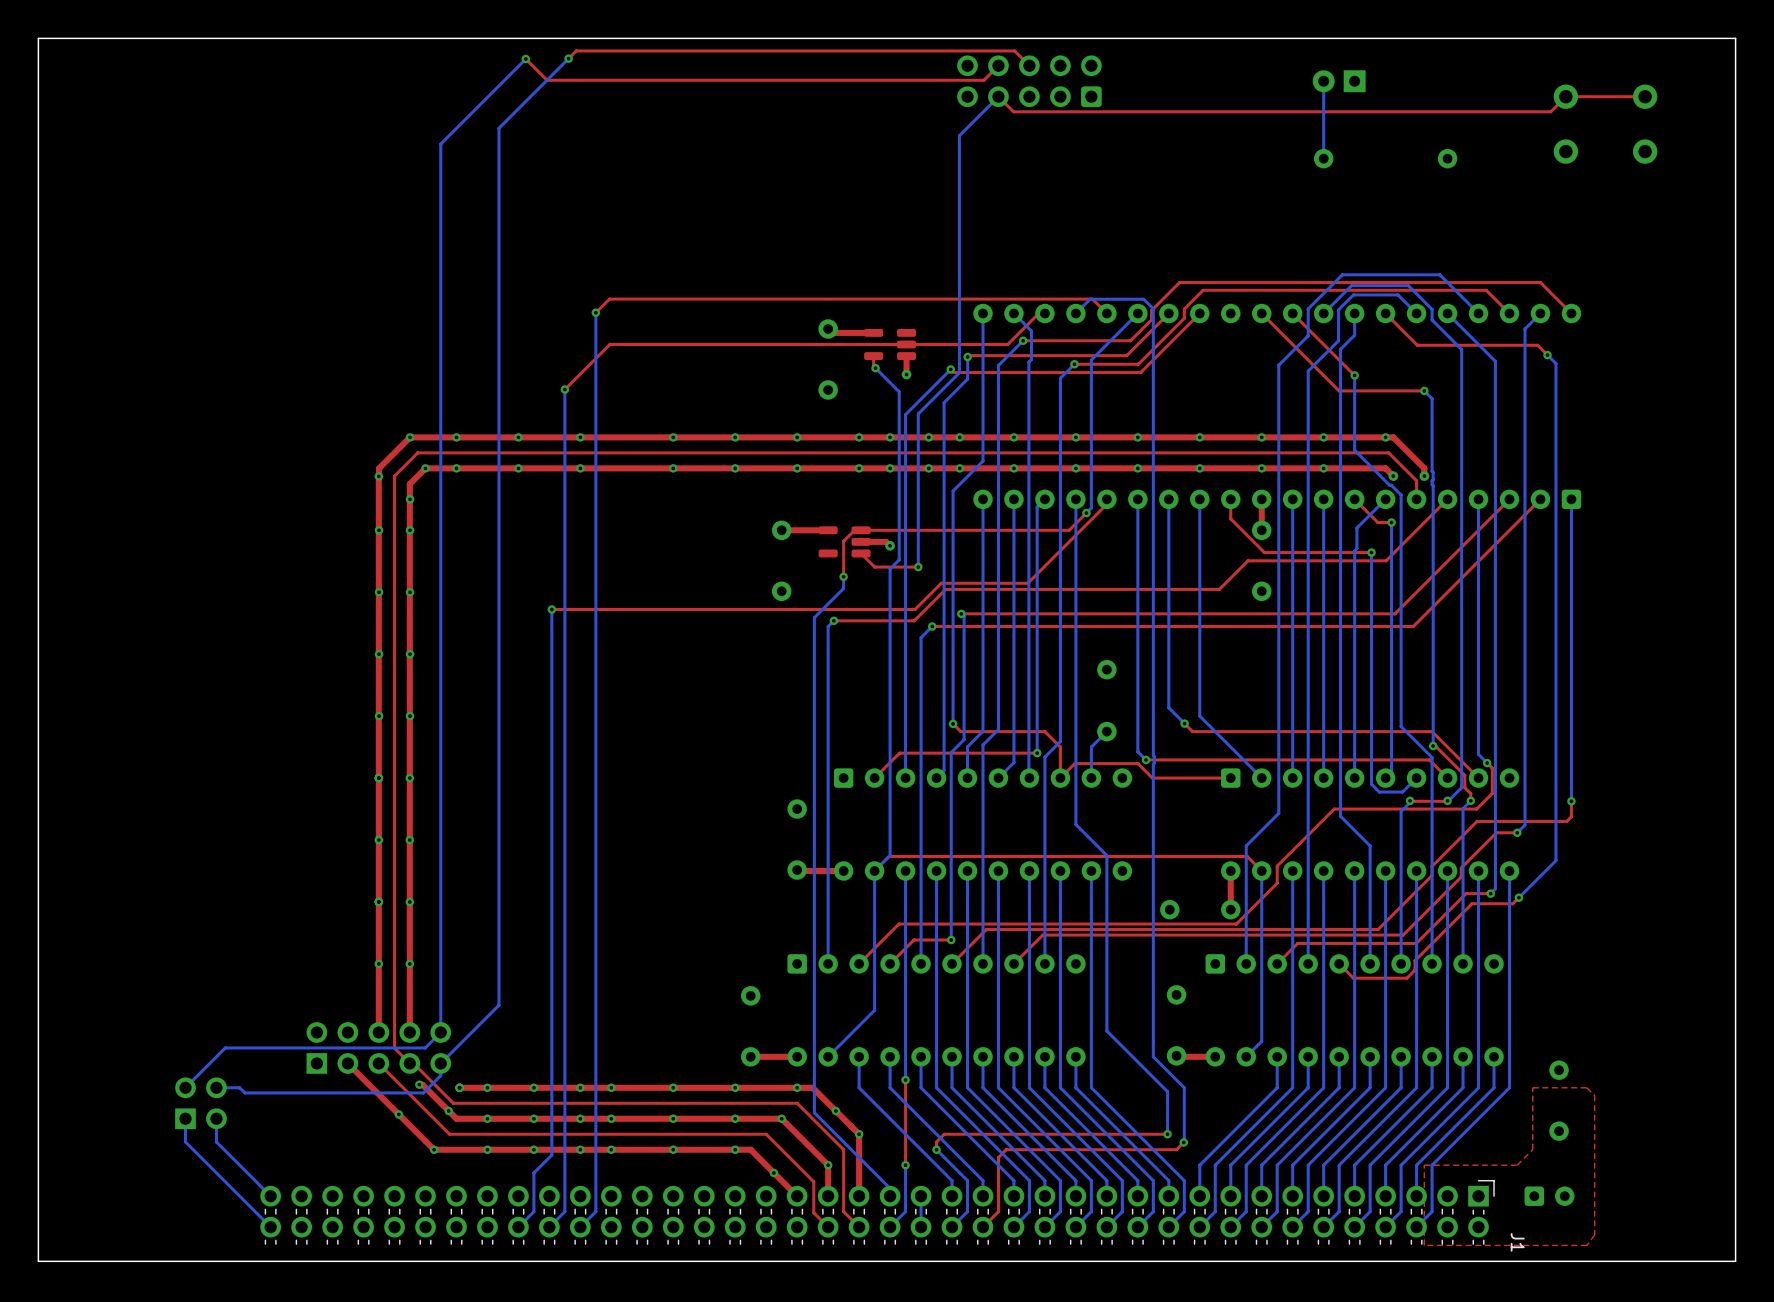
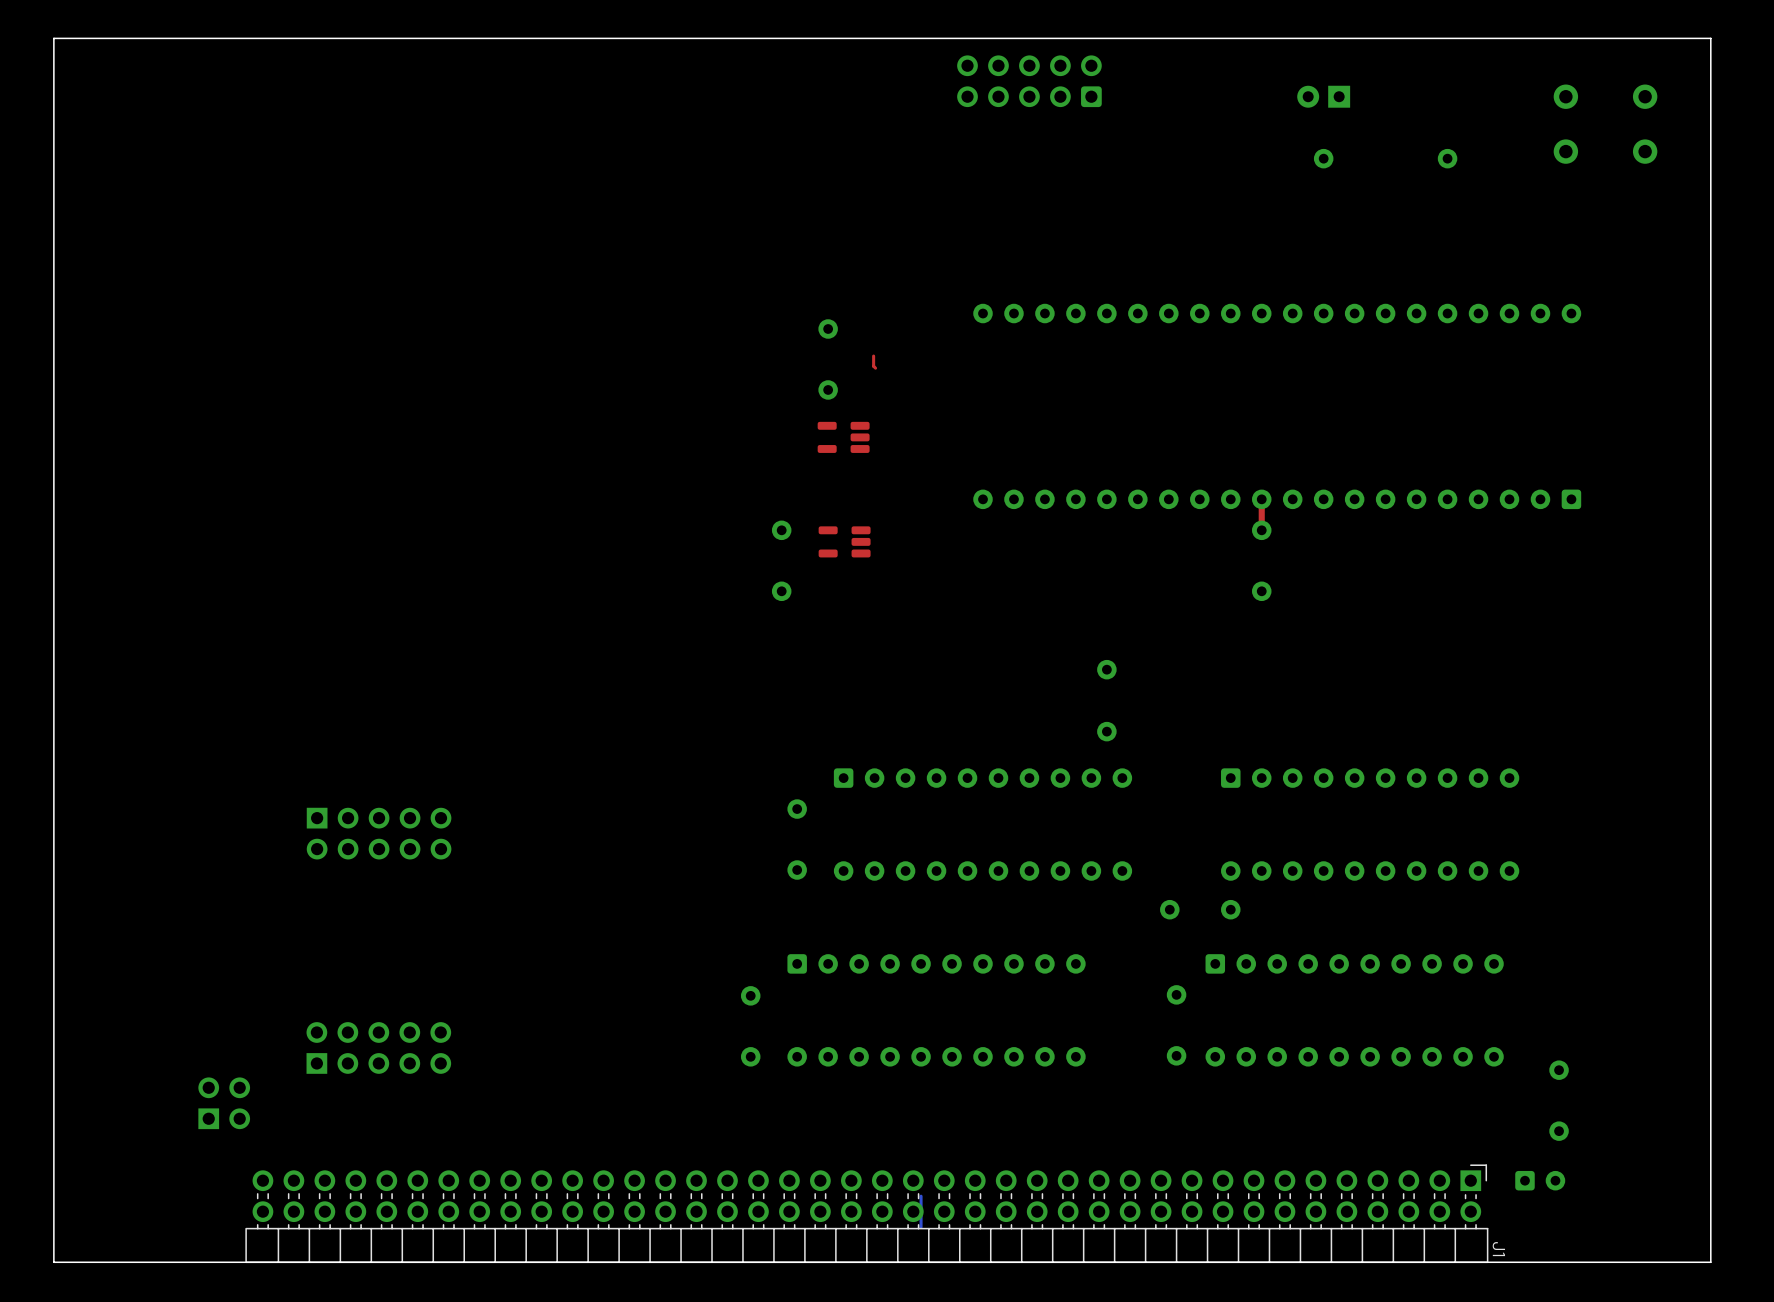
board edge: (1710, 38) (1735, 38) (1735, 1261) (38, 1261) (38, 38) (53, 38) -> (1710, 38) (1710, 1262) (53, 1262) (53, 38)
top track: (568, 58) (576, 50) (1014, 50) (1029, 65) -> none
bottom track: (568, 58) (498, 128) (498, 1005) (440, 1063) (440, 1075) (423, 1092) (244, 1092) (239, 1087) (216, 1087) -> none
via: (568, 58) -> none
top track: (525, 59) (547, 80) (983, 80) (998, 65) -> none
bottom track: (525, 59) (440, 144) (440, 1032) (425, 1047) (225, 1047) (185, 1087) -> none
via: (525, 59) -> none
bottom track: (1323, 81) (1323, 158) -> none
part position: (1339, 81) -> (1323, 96)
bottom track: (998, 96) (959, 135) (959, 372) (918, 413) (918, 567) -> none
top track: (1645, 96) (1565, 96) (1550, 111) (1013, 111) (998, 96) -> none
top track: (595, 312) (609, 299) (1092, 299) (1106, 313) -> none
bottom track: (595, 312) (595, 1211) (580, 1227) -> none
via: (595, 312) -> none
bottom track: (983, 313) (983, 461) (953, 491) (953, 723) -> none
bottom track: (1013, 313) (1031, 330) (1031, 359) (1028, 362) (1028, 777) -> none
top track: (1038, 313) (1007, 344) (609, 344) (564, 389) -> none
bottom track: (1075, 313) (1090, 299) (1143, 299) (1153, 308) (1153, 1056) (1184, 1087) (1183, 1142) -> none
bottom track: (1137, 313) (1091, 359) (1091, 508) (1086, 513) -> none
top track: (1168, 313) (1126, 355) (967, 356) -> none
top track: (1199, 313) (1140, 372) (953, 372) (950, 369) -> none
top track: (1261, 313) (1339, 390) (1424, 390) -> none
top track: (1292, 313) (1354, 375) -> none
bottom track: (1323, 313) (1351, 285) (1408, 285) (1432, 309) (1432, 319) (1461, 349) (1461, 787) (1447, 800) -> none
bottom track: (1354, 313) (1354, 335) (1340, 349) (1340, 816) (1370, 845) (1370, 963) -> none
top track: (1385, 313) (1417, 345) (1537, 345) (1547, 355) -> none
bottom track: (1416, 313) (1398, 294) (1353, 294) (1338, 309) (1338, 340) (1308, 371) (1308, 963) -> none
bottom track: (1447, 313) (1495, 361) (1495, 888) (1490, 893) -> none
bottom track: (1478, 313) (1439, 274) (1342, 274) (1308, 308) (1308, 335) (1278, 365) (1278, 813) (1246, 845) (1246, 963) -> none
top track: (1509, 313) (1486, 290) (1203, 290) (1184, 309) (1184, 318) (1138, 364) (1074, 364) -> none
bottom track: (1540, 313) (1524, 329) (1524, 825) (1517, 832) -> none
top track: (1571, 313) (1540, 282) (1179, 282) (1151, 310) (1151, 319) (1130, 340) (1023, 340) -> none
top track: (873, 332) (832, 332) -> none
bottom track: (1023, 340) (998, 365) (998, 729) (983, 745) (983, 963) -> none
via: (1023, 340) -> none
part position: (890, 344) -> (843, 437)
bottom track: (1547, 355) (1555, 363) (1555, 860) (1518, 897) -> none
via: (1547, 355) -> none
top track: (906, 356) (906, 374) -> none
bottom track: (967, 356) (967, 379) (944, 402) (944, 770) (936, 778) -> none
via: (967, 356) -> none
bottom track: (1074, 364) (1060, 378) (1060, 741) (1044, 757) (1044, 963) -> none
via: (1074, 364) -> none
bottom track: (875, 368) (899, 391) (899, 559) (890, 568) (890, 855) (874, 870) (874, 1010) (828, 1056) -> none
via: (875, 368) -> none
bottom track: (950, 369) (905, 414) (905, 778) -> none
via: (950, 369) -> none
via: (906, 374) -> none
bottom track: (1354, 375) (1354, 450) (1401, 495) (1401, 726) (1432, 757) (1432, 963) -> none
via: (1354, 375) -> none
bottom track: (564, 389) (564, 1211) (549, 1227) -> none
via: (564, 389) -> none
bottom track: (1424, 390) (1432, 398) (1433, 746) -> none
via: (1424, 390) -> none
via: (410, 437) -> none
via: (456, 437) -> none
via: (518, 437) -> none
via: (580, 437) -> none
via: (673, 437) -> none
via: (735, 437) -> none
via: (797, 437) -> none
via: (859, 437) -> none
via: (890, 437) -> none
via: (928, 437) -> none
via: (959, 437) -> none
via: (1013, 437) -> none
via: (1075, 437) -> none
via: (1137, 437) -> none
via: (1199, 437) -> none
via: (1261, 437) -> none
via: (1323, 437) -> none
via: (1385, 437) -> none
via: (425, 468) -> none
via: (456, 468) -> none
via: (518, 468) -> none
via: (580, 468) -> none
via: (673, 468) -> none
via: (735, 468) -> none
via: (797, 468) -> none
via: (859, 468) -> none
via: (890, 468) -> none
via: (928, 468) -> none
via: (959, 468) -> none
via: (1013, 468) -> none
via: (1075, 468) -> none
via: (1137, 468) -> none
via: (1199, 468) -> none
via: (1261, 468) -> none
via: (1323, 468) -> none
via: (378, 476) -> none
top track: (1393, 476) (1385, 468) (425, 468) (409, 484) (409, 1032) -> none
via: (1393, 476) -> none
top track: (1424, 476) (1424, 468) (1393, 437) (410, 437) (379, 468) (378, 1032) -> none
via: (1424, 476) -> none
via: (410, 499) -> none
bottom track: (983, 499) (983, 731) (967, 746) (967, 778) -> none
bottom track: (1013, 499) (1013, 762) (998, 778) -> none
bottom track: (1044, 499) (1037, 507) (1037, 753) -> none
bottom track: (1075, 499) (1075, 824) (1106, 855) (1106, 1031) (1167, 1091) (1167, 1134) -> none
bottom track: (1137, 499) (1137, 751) (1146, 759) -> none
bottom track: (1168, 499) (1168, 707) (1184, 723) -> none
bottom track: (1199, 499) (1199, 716) (1261, 778) -> none
top track: (1230, 499) (1230, 518) (1264, 552) (1371, 552) -> none
bottom track: (1292, 499) (1292, 778) -> none
bottom track: (1323, 499) (1323, 778) -> none
top track: (1354, 499) (1377, 522) (1391, 522) -> none
bottom track: (1385, 499) (1356, 528) (1356, 548) (1354, 550) (1354, 778) -> none
top track: (1416, 499) (1416, 480) (1388, 452) (417, 452) (394, 476) (394, 1048) (409, 1063) (416, 1063) -> none
top track: (1447, 499) (1386, 560) (1247, 560) (1219, 589) (945, 589) (914, 620) (833, 620) -> none
bottom track: (1478, 499) (1478, 754) (1487, 763) -> none
top track: (1509, 499) (1394, 613) (961, 613) -> none
top track: (1540, 499) (1413, 626) (932, 626) -> none
bottom track: (1571, 499) (1571, 801) -> none
top track: (1106, 504) (1027, 583) (941, 583) (915, 609) (551, 609) -> none
top track: (1086, 513) (1069, 530) (861, 530) -> none
via: (1086, 513) -> none
bottom track: (1391, 522) (1391, 772) (1385, 778) -> none
via: (1391, 522) -> none
via: (379, 530) -> none
via: (410, 530) -> none
top track: (828, 530) (781, 530) -> none
top track: (854, 530) (843, 541) (843, 576) -> none
top track: (861, 541) (886, 541) (890, 545) -> none
via: (890, 545) -> none
bottom track: (1371, 552) (1371, 784) (1379, 792) (1402, 792) (1416, 778) -> none
via: (1371, 552) -> none
top track: (861, 553) (874, 567) (918, 567) -> none
via: (918, 567) -> none
bottom track: (843, 576) (843, 588) (814, 617) (814, 1112) (890, 1188) (890, 1196) -> none
via: (843, 576) -> none
via: (379, 592) -> none
via: (410, 592) -> none
bottom track: (551, 609) (551, 1155) (533, 1172) (533, 1211) (518, 1227) -> none
via: (551, 609) -> none
via: (961, 613) -> none
bottom track: (965, 613) (961, 613) (964, 616) (964, 739) (951, 752) (951, 939) -> none
bottom track: (833, 620) (828, 626) (828, 963) -> none
via: (833, 620) -> none
bottom track: (932, 626) (921, 637) (921, 963) -> none
via: (932, 626) -> none
via: (379, 654) -> none
via: (410, 654) -> none
via: (379, 716) -> none
via: (410, 716) -> none
top track: (953, 723) (960, 731) (1044, 731) (1060, 747) (1060, 778) (1074, 763) (1137, 763) (1152, 778) (1230, 778) -> none
via: (953, 723) -> none
top track: (1184, 723) (1192, 731) (1432, 731) (1478, 778) -> none
via: (1184, 723) -> none
bottom track: (1106, 731) (1091, 747) (1091, 778) -> none
top track: (1433, 746) (1435, 746) (1464, 775) (1464, 787) (1470, 793) (1470, 800) -> none
via: (1433, 746) -> none
top track: (1037, 753) (899, 753) (874, 778) -> none
via: (1037, 753) -> none
top track: (1146, 759) (1429, 759) (1447, 778) -> none
via: (1146, 759) -> none
top track: (1487, 763) (1492, 768) (1492, 793) (1476, 809) (1334, 809) (1277, 866) (1277, 883) (1236, 924) (898, 924) (859, 963) -> none
via: (1487, 763) -> none
via: (378, 778) -> none
via: (409, 778) -> none
bottom track: (1410, 800) (1401, 811) (1401, 963) -> none
via: (1410, 800) -> none
top track: (1447, 800) (1410, 800) -> none
via: (1447, 800) -> none
bottom track: (1470, 800) (1463, 808) (1463, 963) -> none
via: (1470, 800) -> none
top track: (1571, 801) (1571, 816) (1566, 821) (1477, 821) (1432, 866) (1432, 875) (1378, 929) (986, 929) (952, 963) -> none
via: (1571, 801) -> none
top track: (1517, 832) (1496, 832) (1461, 867) (1461, 876) (1403, 935) (1042, 935) (1013, 963) -> none
via: (1517, 832) -> none
part: none -> (379, 833)
via: (378, 840) -> none
via: (409, 840) -> none
top track: (843, 870) (798, 870) -> none
bottom track: (905, 870) (905, 1080) -> none
bottom track: (936, 870) (936, 1087) (1029, 1180) (1029, 1211) (1013, 1227) -> none
bottom track: (967, 870) (967, 1087) (1060, 1180) (1060, 1211) (1044, 1227) -> none
bottom track: (998, 870) (998, 1087) (1091, 1180) (1091, 1211) (1075, 1227) -> none
bottom track: (1029, 870) (1029, 1087) (1122, 1180) (1122, 1211) (1106, 1227) -> none
bottom track: (1060, 870) (1060, 1087) (1153, 1180) (1153, 1211) (1137, 1227) -> none
bottom track: (1091, 870) (1091, 1087) (1184, 1180) (1184, 1211) (1168, 1227) -> none
top track: (1230, 870) (1230, 909) -> none
top track: (1261, 870) (1247, 856) (889, 856) (874, 870) -> none
bottom track: (1261, 870) (1261, 1041) (1246, 1056) -> none
bottom track: (1292, 870) (1292, 1087) (1215, 1165) (1215, 1211) (1199, 1227) -> none
bottom track: (1323, 870) (1323, 1087) (1246, 1165) (1246, 1211) (1230, 1227) -> none
bottom track: (1354, 870) (1354, 1087) (1277, 1165) (1277, 1211) (1261, 1227) -> none
bottom track: (1385, 870) (1385, 1087) (1308, 1165) (1308, 1211) (1292, 1227) -> none
bottom track: (1416, 870) (1416, 1087) (1339, 1165) (1339, 1211) (1323, 1227) -> none
bottom track: (1447, 870) (1447, 1087) (1370, 1165) (1370, 1211) (1354, 1227) -> none
bottom track: (1478, 870) (1478, 1087) (1401, 1165) (1401, 1211) (1385, 1227) -> none
bottom track: (1509, 870) (1509, 1087) (1432, 1165) (1432, 1211) (1416, 1227) -> none
top track: (1490, 893) (1466, 893) (1416, 943) (1297, 943) (1277, 963) -> none
via: (1490, 893) -> none
top track: (1518, 897) (1512, 903) (1471, 903) (1415, 960) (1415, 970) (1406, 978) (1353, 978) (1339, 963) -> none
via: (1518, 897) -> none
via: (378, 901) -> none
via: (409, 901) -> none
top track: (951, 939) (913, 939) (890, 963) -> none
via: (951, 939) -> none
via: (378, 963) -> none
via: (409, 963) -> none
top track: (797, 1056) (750, 1056) -> none
bottom track: (859, 1056) (859, 1087) (952, 1180) (952, 1196) -> none
bottom track: (890, 1056) (890, 1087) (983, 1180) (983, 1196) -> none
bottom track: (921, 1056) (921, 1087) (1013, 1180) (1013, 1196) -> none
bottom track: (952, 1056) (952, 1087) (1044, 1180) (1044, 1196) -> none
bottom track: (983, 1056) (983, 1087) (1075, 1180) (1075, 1196) -> none
bottom track: (1013, 1056) (1013, 1087) (1106, 1180) (1106, 1196) -> none
bottom track: (1044, 1056) (1044, 1087) (1137, 1180) (1137, 1196) -> none
bottom track: (1075, 1056) (1075, 1087) (1168, 1180) (1168, 1196) -> none
top track: (1215, 1056) (1177, 1056) -> none
bottom track: (1277, 1056) (1277, 1087) (1199, 1165) (1199, 1196) -> none
bottom track: (1308, 1056) (1308, 1087) (1230, 1165) (1230, 1196) -> none
bottom track: (1339, 1056) (1339, 1087) (1261, 1165) (1261, 1196) -> none
bottom track: (1370, 1056) (1370, 1087) (1292, 1165) (1292, 1196) -> none
bottom track: (1401, 1056) (1401, 1087) (1323, 1165) (1323, 1196) -> none
bottom track: (1432, 1056) (1432, 1087) (1354, 1165) (1354, 1196) -> none
bottom track: (1463, 1056) (1463, 1087) (1385, 1165) (1385, 1196) -> none
bottom track: (1494, 1056) (1494, 1087) (1416, 1165) (1416, 1196) -> none
top track: (347, 1063) (434, 1149) (750, 1149) (797, 1196) -> none
top track: (378, 1063) (449, 1134) (766, 1134) (813, 1181) (813, 1212) (828, 1227) -> none
top track: (413, 1063) (453, 1103) (797, 1103) (843, 1149) (843, 1211) (859, 1227) -> none
top track: (905, 1080) (905, 1165) -> none
via: (905, 1080) -> none
top track: (419, 1084) (422, 1084) (456, 1118) (781, 1118) (828, 1165) (828, 1196) -> none
via: (419, 1084) -> none
top track: (459, 1087) (812, 1087) (859, 1134) (859, 1196) -> none
via: (459, 1087) -> none
via: (487, 1087) -> none
via: (533, 1087) -> none
via: (580, 1087) -> none
via: (611, 1087) -> none
via: (673, 1087) -> none
via: (735, 1087) -> none
via: (797, 1087) -> none
top zone outline: (1586, 1087) (1532, 1087) (1532, 1149) (1517, 1165) (1424, 1165) (1424, 1245) (1586, 1245) (1594, 1234) (1594, 1095) (1586, 1087) -> none
part position: (200, 1103) -> (224, 1103)
via: (448, 1111) -> none
via: (835, 1111) -> none
via: (398, 1114) -> none
bottom track: (185, 1118) (185, 1141) (270, 1227) -> none
bottom track: (216, 1118) (216, 1141) (270, 1196) -> none
via: (487, 1118) -> none
via: (533, 1118) -> none
via: (580, 1118) -> none
via: (611, 1118) -> none
via: (673, 1118) -> none
via: (735, 1118) -> none
via: (781, 1118) -> none
via: (859, 1134) -> none
top track: (1167, 1134) (944, 1134) (936, 1141) (936, 1149) -> none
via: (1167, 1134) -> none
top track: (1183, 1142) (1176, 1149) (1006, 1149) (998, 1157) (998, 1211) (983, 1227) -> none
via: (1183, 1142) -> none
via: (434, 1149) -> none
via: (487, 1149) -> none
via: (533, 1149) -> none
via: (580, 1149) -> none
via: (611, 1149) -> none
via: (673, 1149) -> none
via: (735, 1149) -> none
bottom track: (936, 1149) (967, 1180) (967, 1211) (952, 1227) -> none
via: (936, 1149) -> none
via: (828, 1165) -> none
bottom track: (905, 1165) (905, 1211) (890, 1227) -> none
via: (905, 1165) -> none
via: (773, 1172) -> none
J1 footprint: [260, 1179, 1495, 1245] -> [245, 1164, 1489, 1264]
part position: (1549, 1196) -> (1540, 1180)

